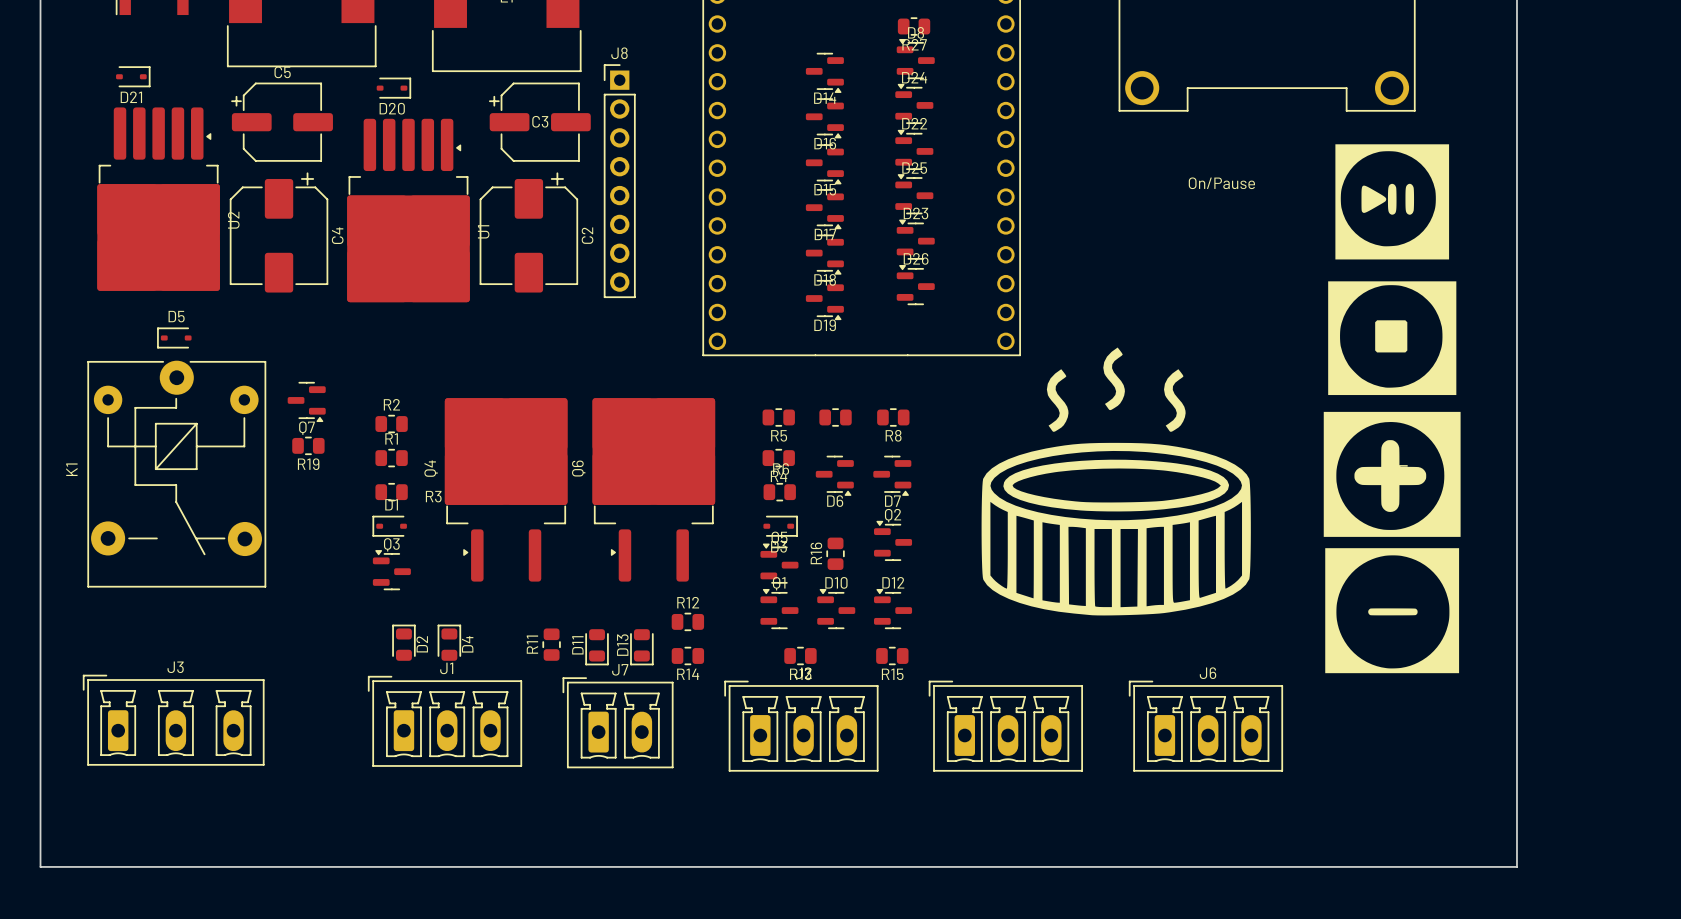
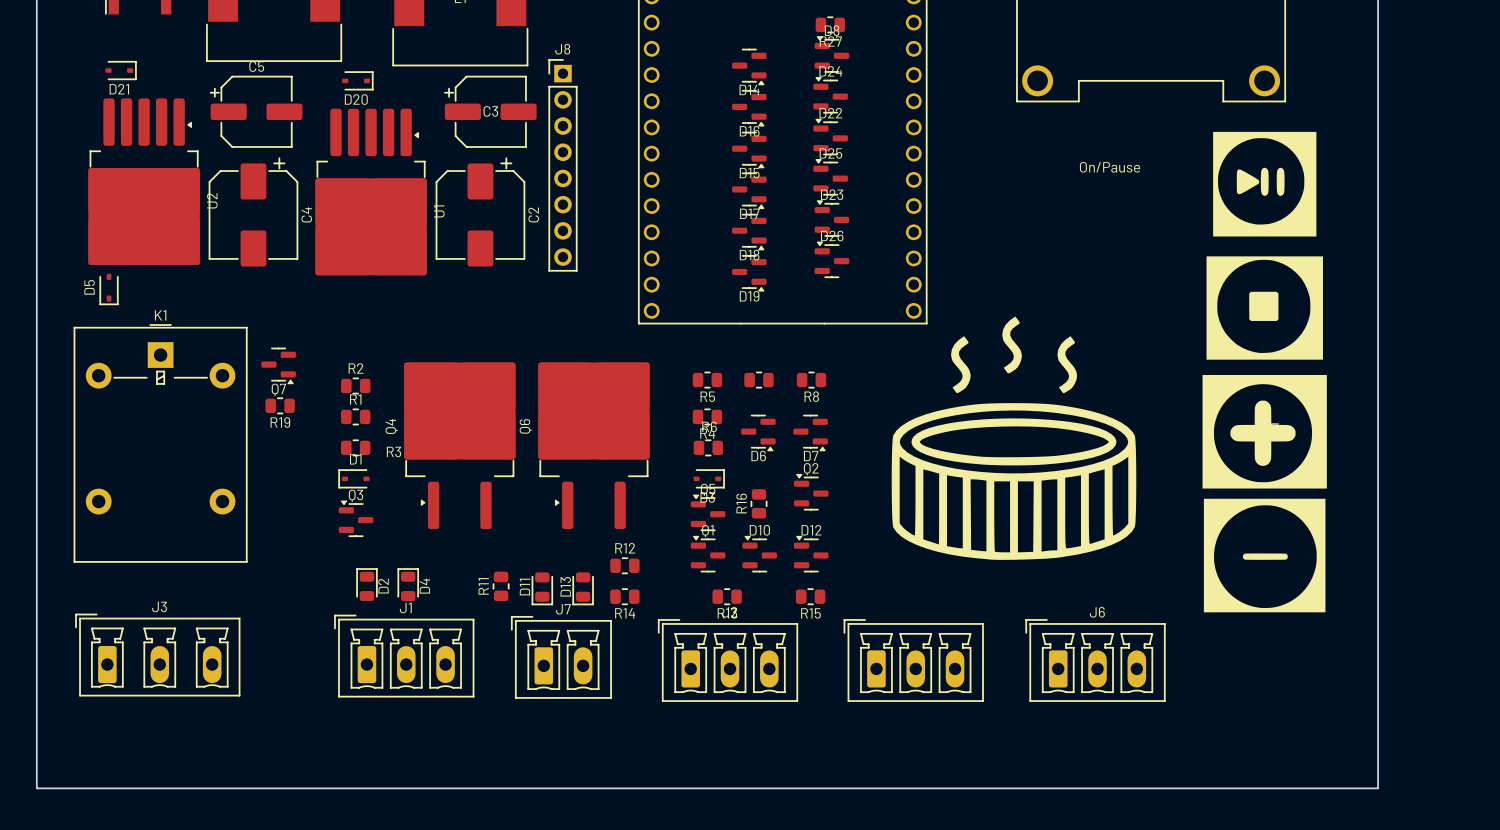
D5 rotation: 0° (174, 337) -> 90° counterclockwise (109, 289)
D5 position: (174, 337) -> (109, 289)
K1 footprint: [87, 360, 267, 588] -> [73, 324, 248, 563]
K1 name position: K1 (71, 469) -> K1 (160, 315)

